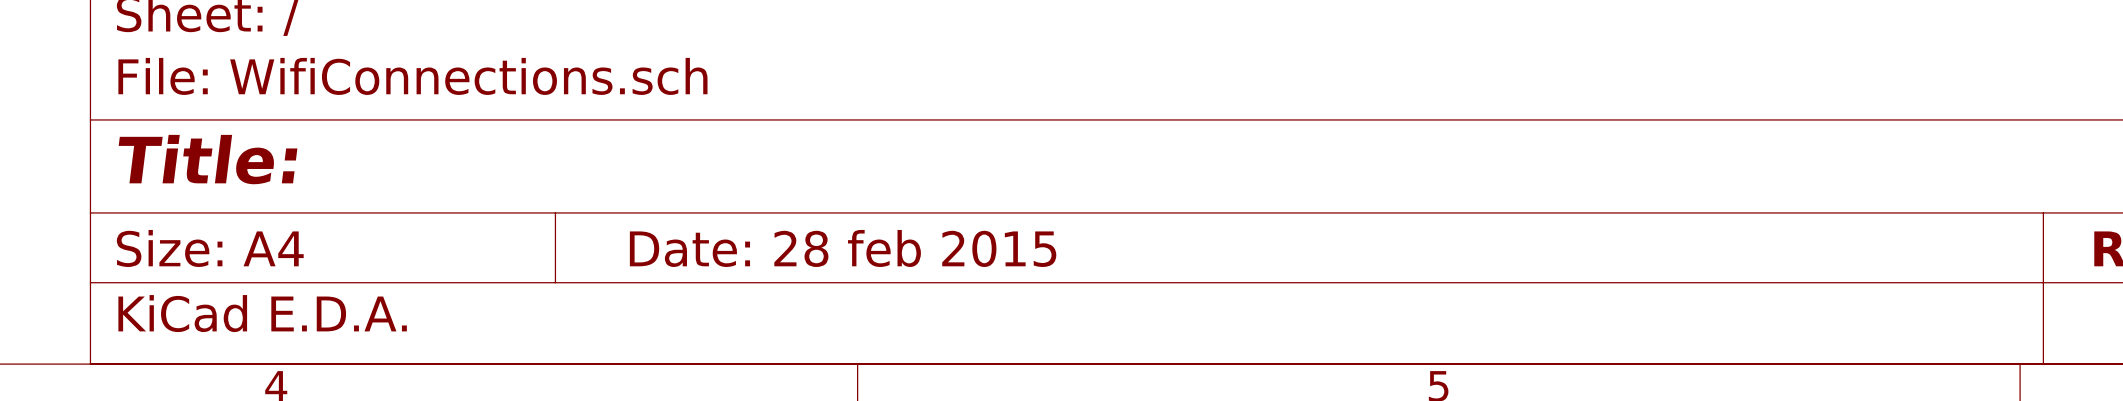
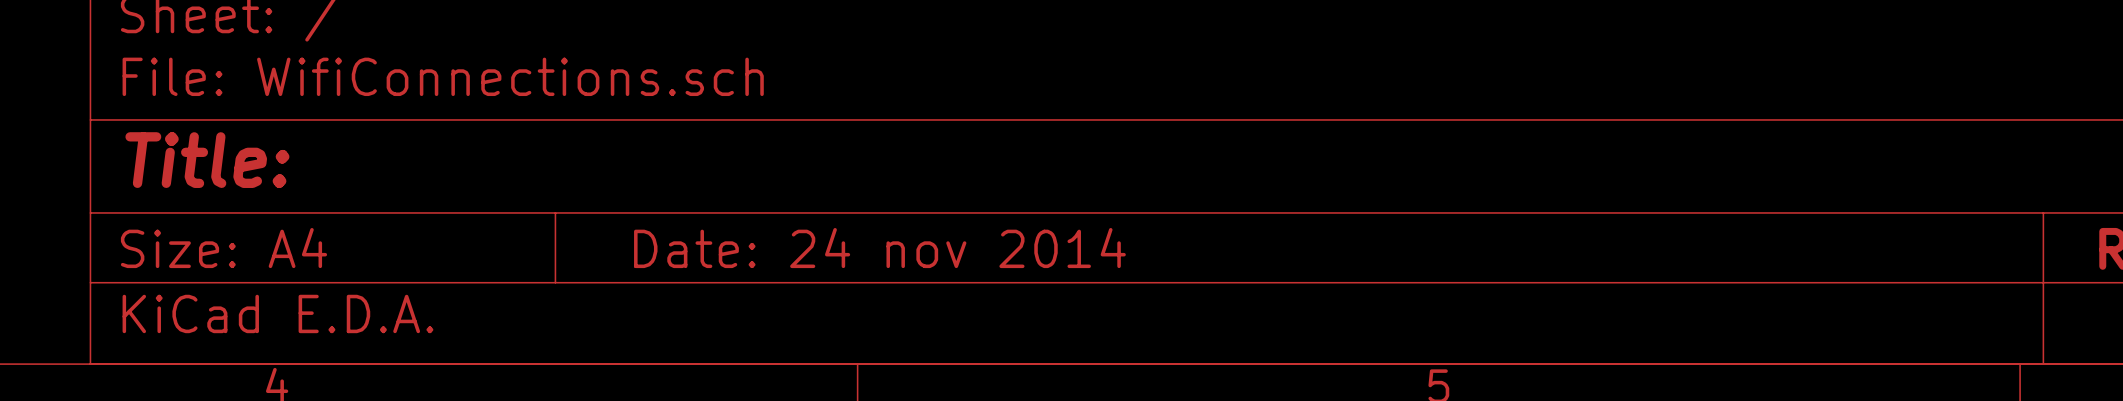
title block: Date: 28 feb 2015 (843, 248) -> Date: 24 nov 2014 (879, 248)

